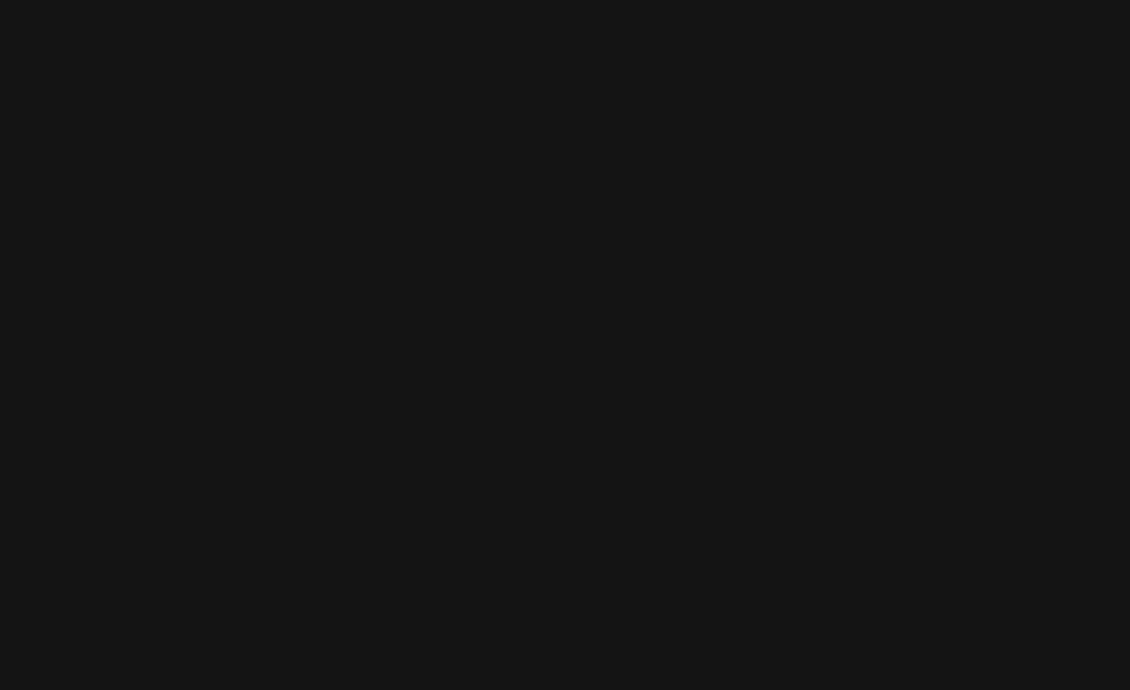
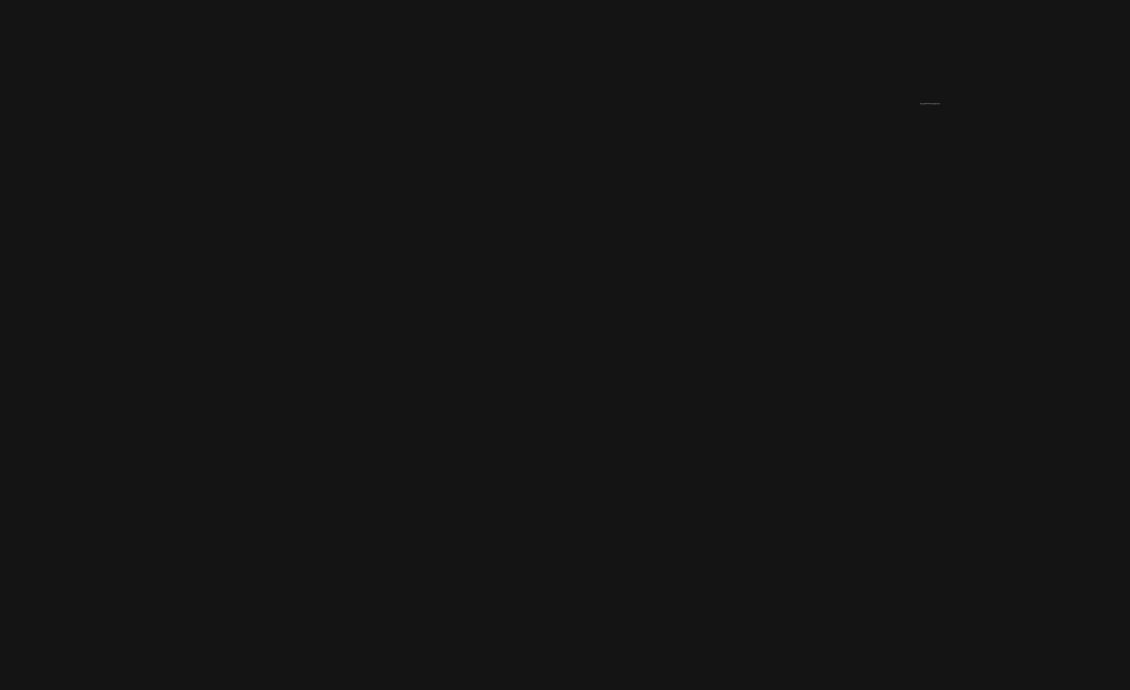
zone outline: none -> (920, 103) (939, 103) (920, 103)

